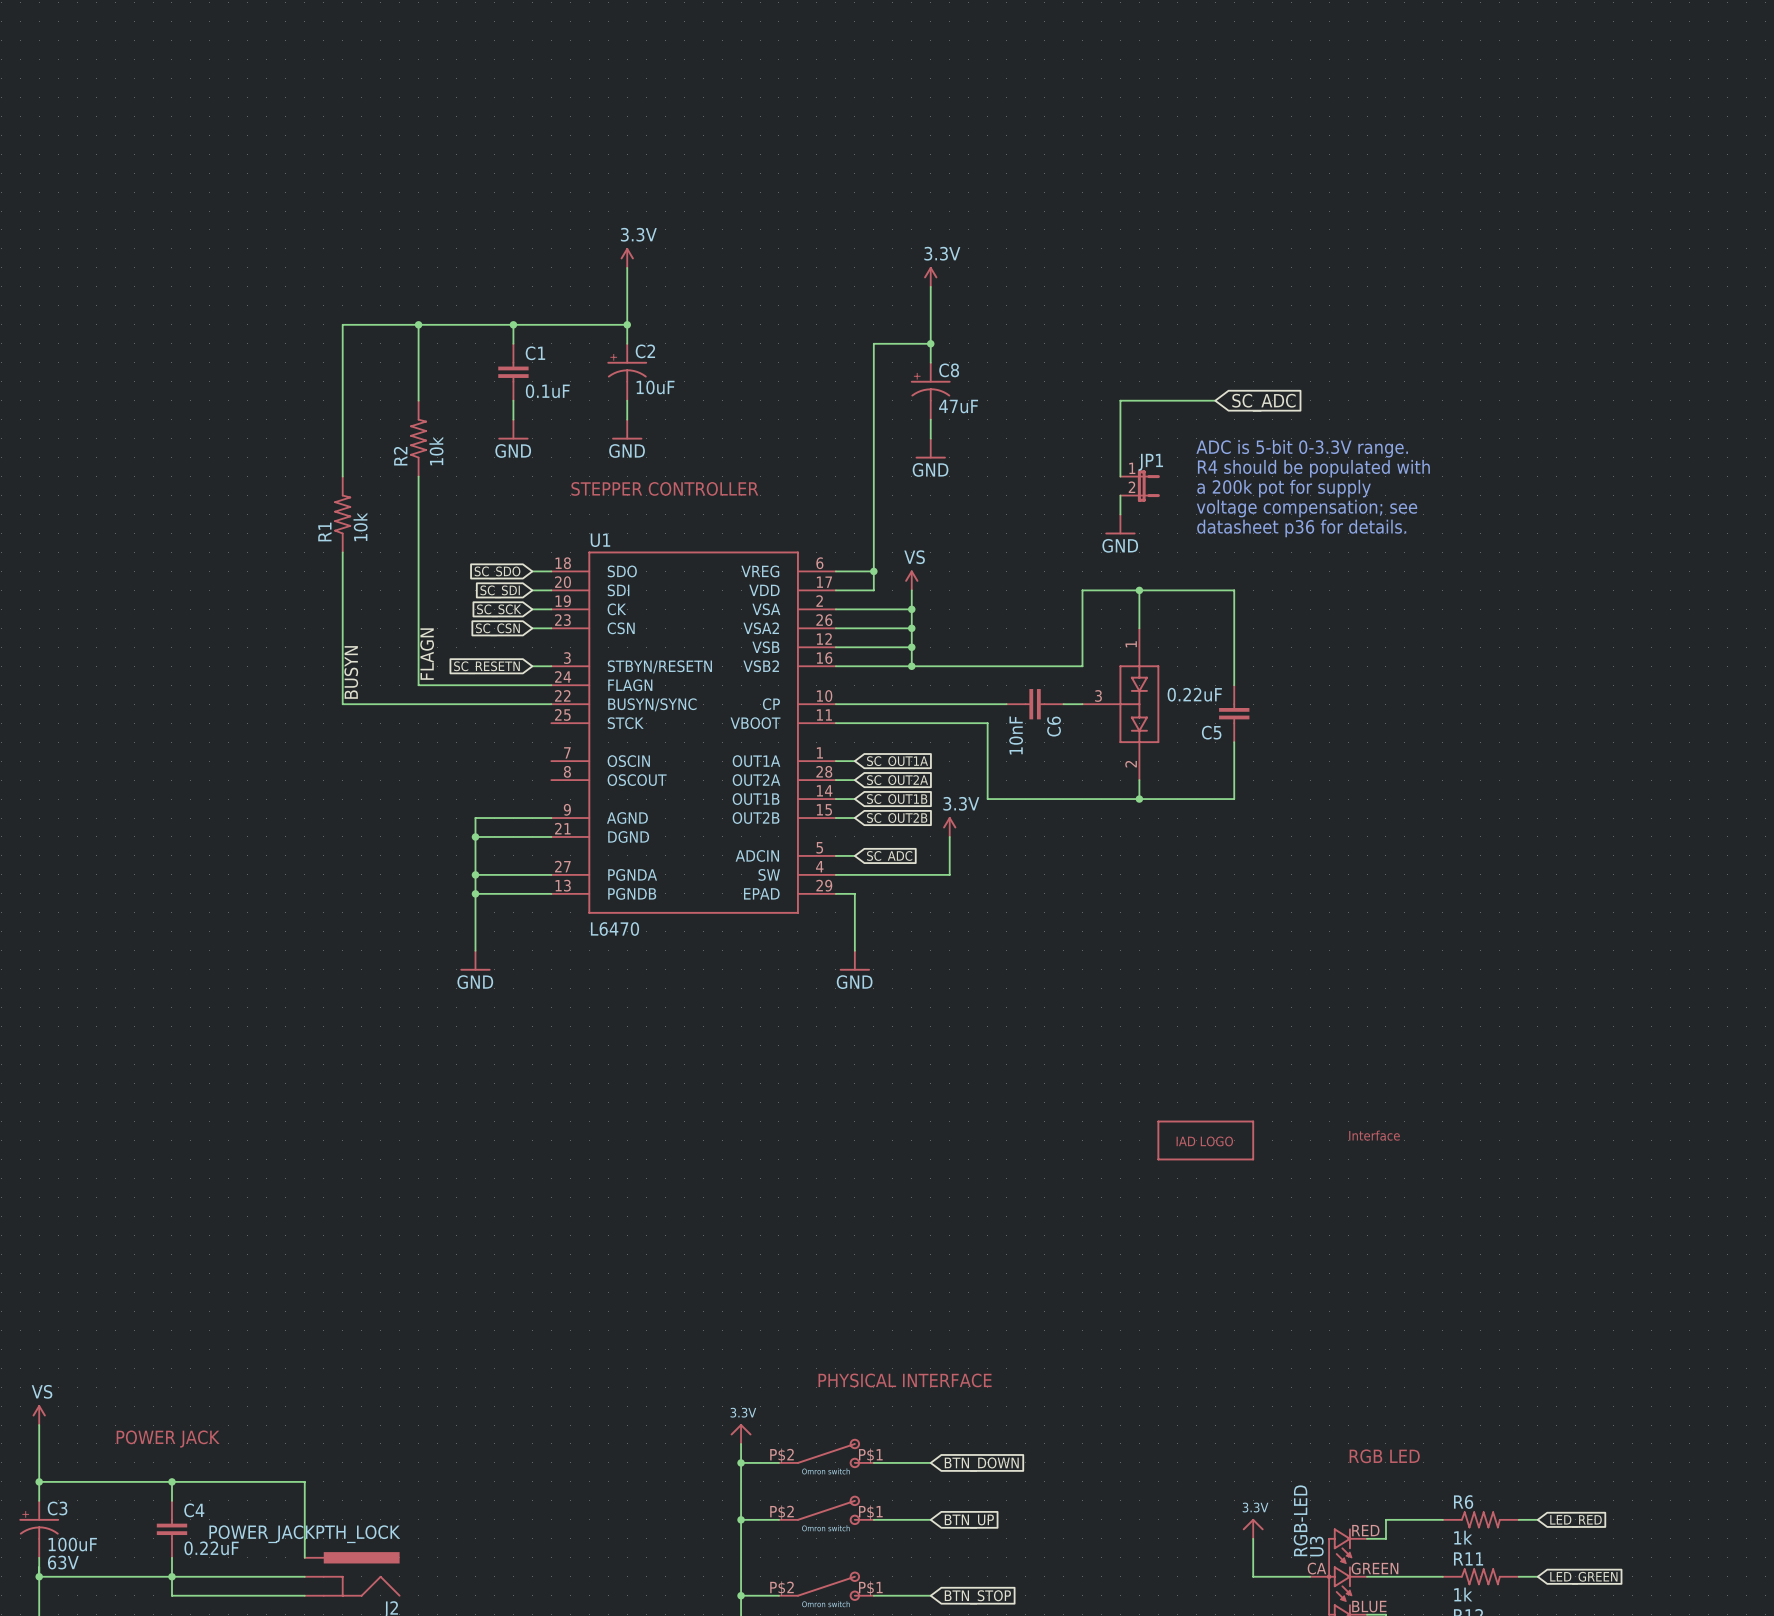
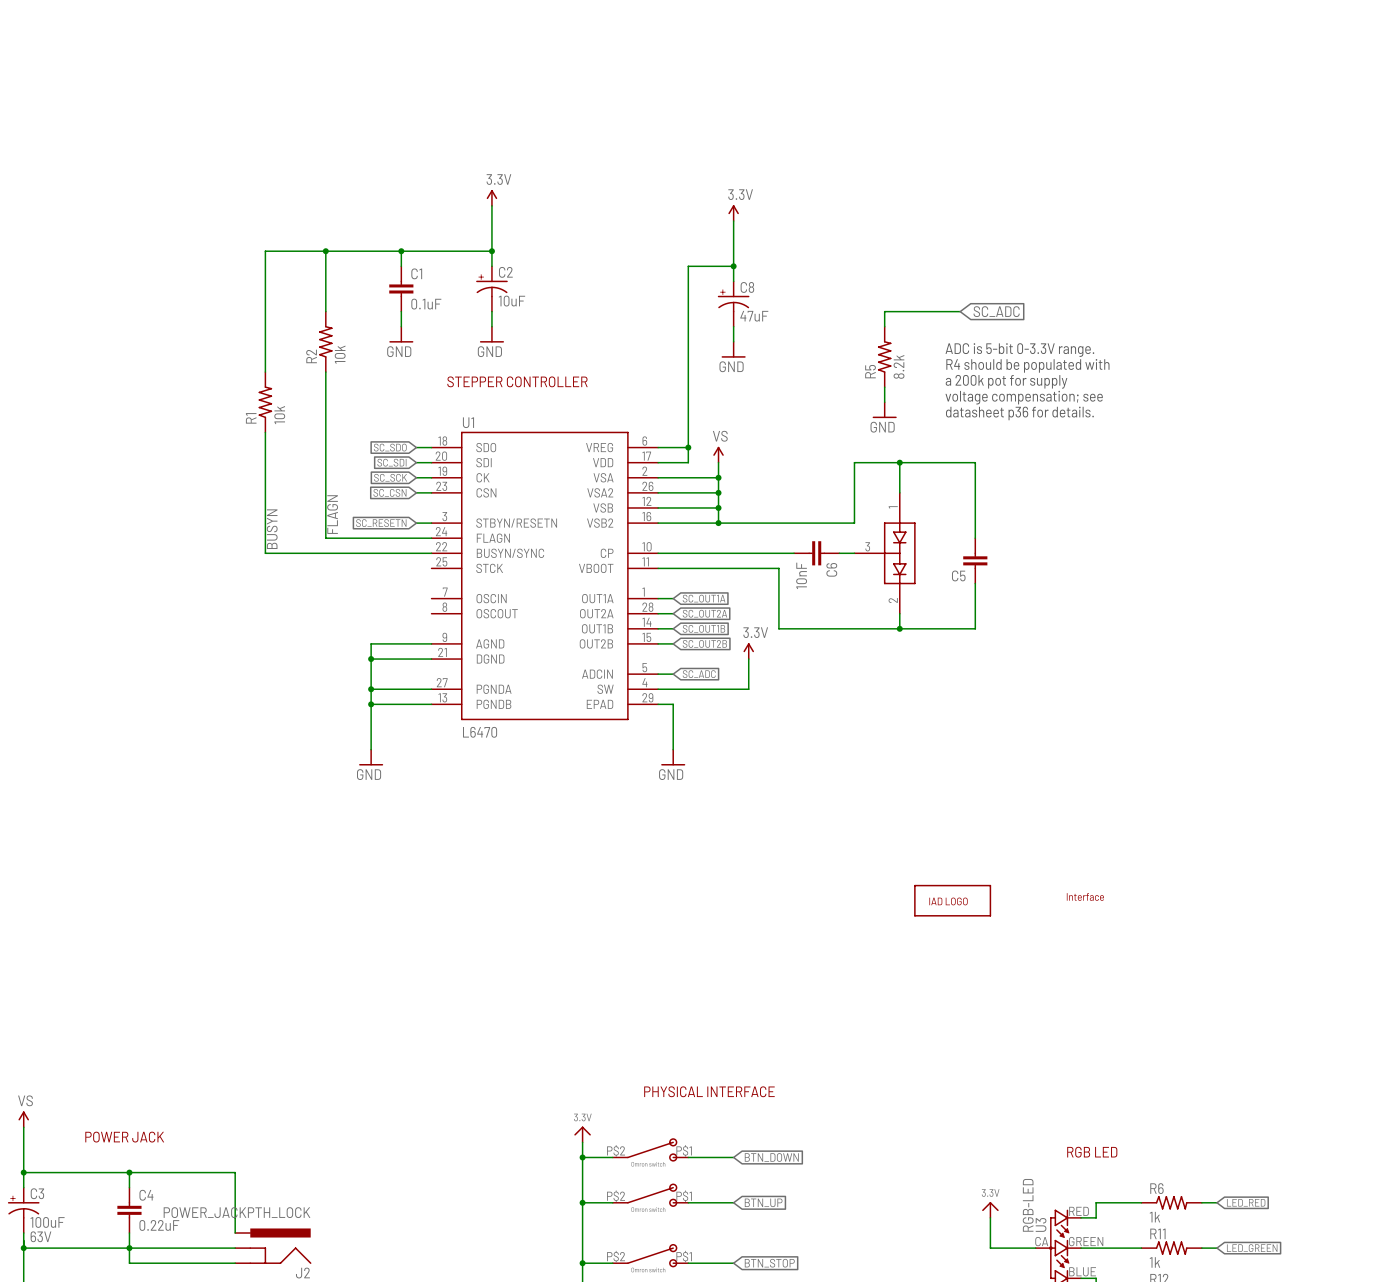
R5: none -> 8.2k (884, 356)
JP1: (1140, 486) -> none
C5 value: 0.22uF (1194, 694) -> none

